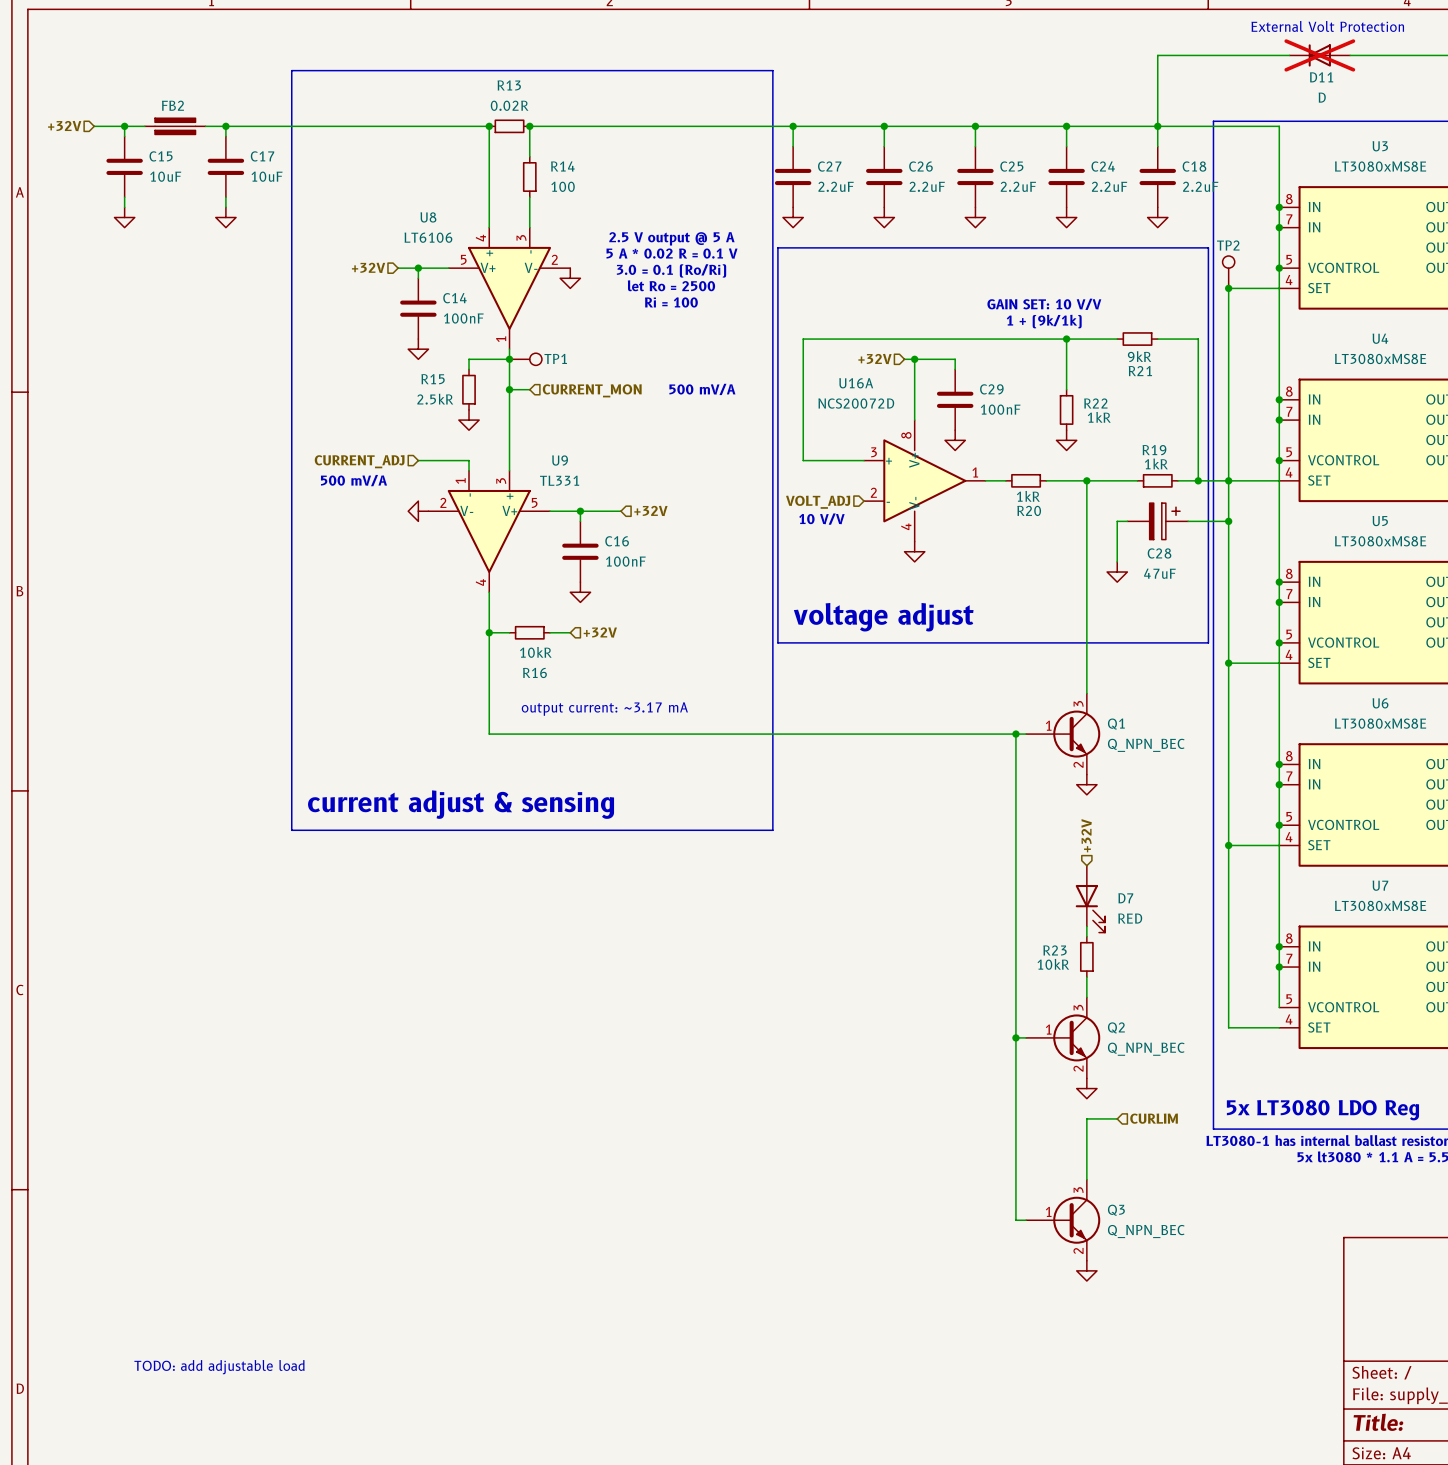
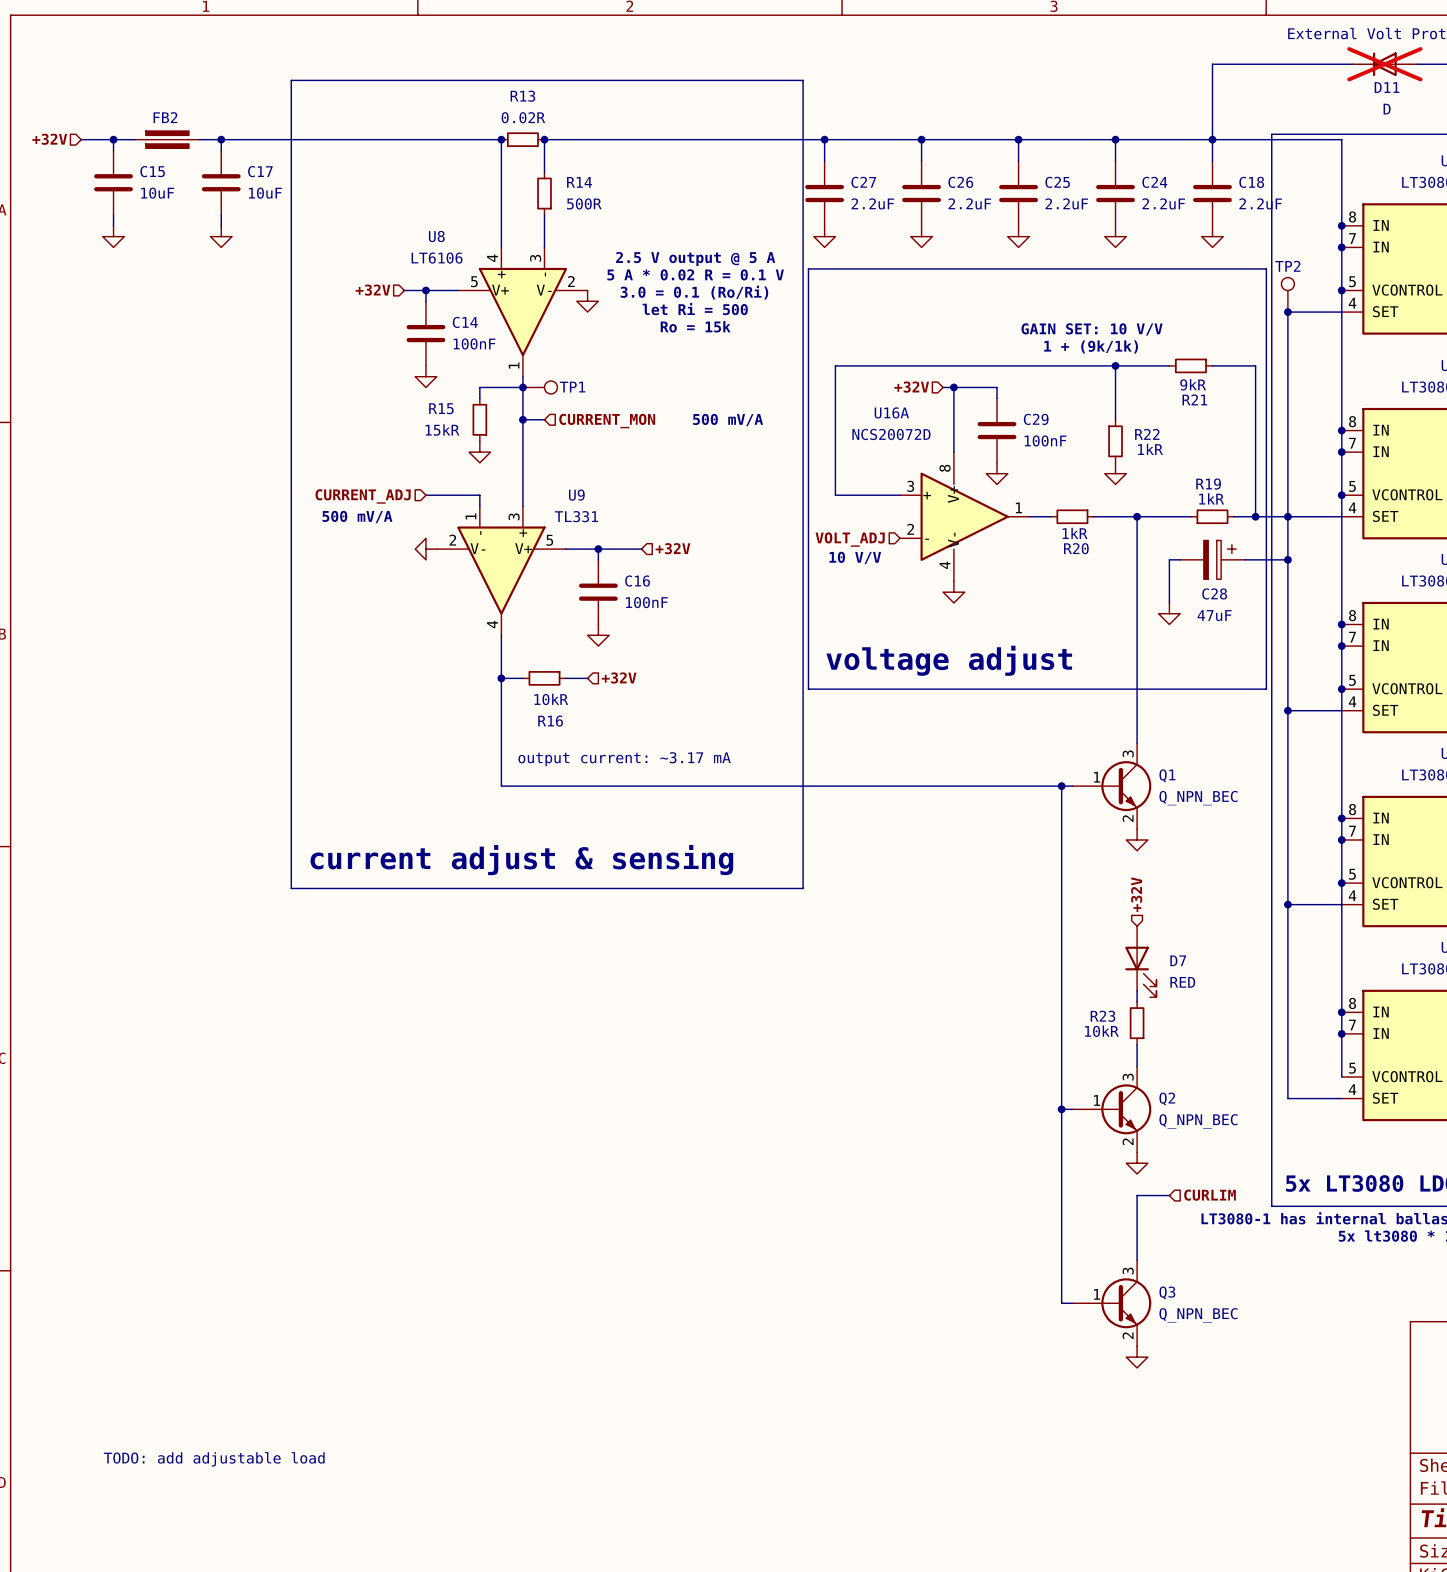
R14 value: 100 (563, 186) -> 500R (584, 203)
text: let Ro = 2500 (671, 285) -> let Ri = 500 (695, 309)
text: Ri = 100 (671, 302) -> Ro = 15k (695, 326)
R15 value: 2.5kR (435, 399) -> 15kR (442, 430)

